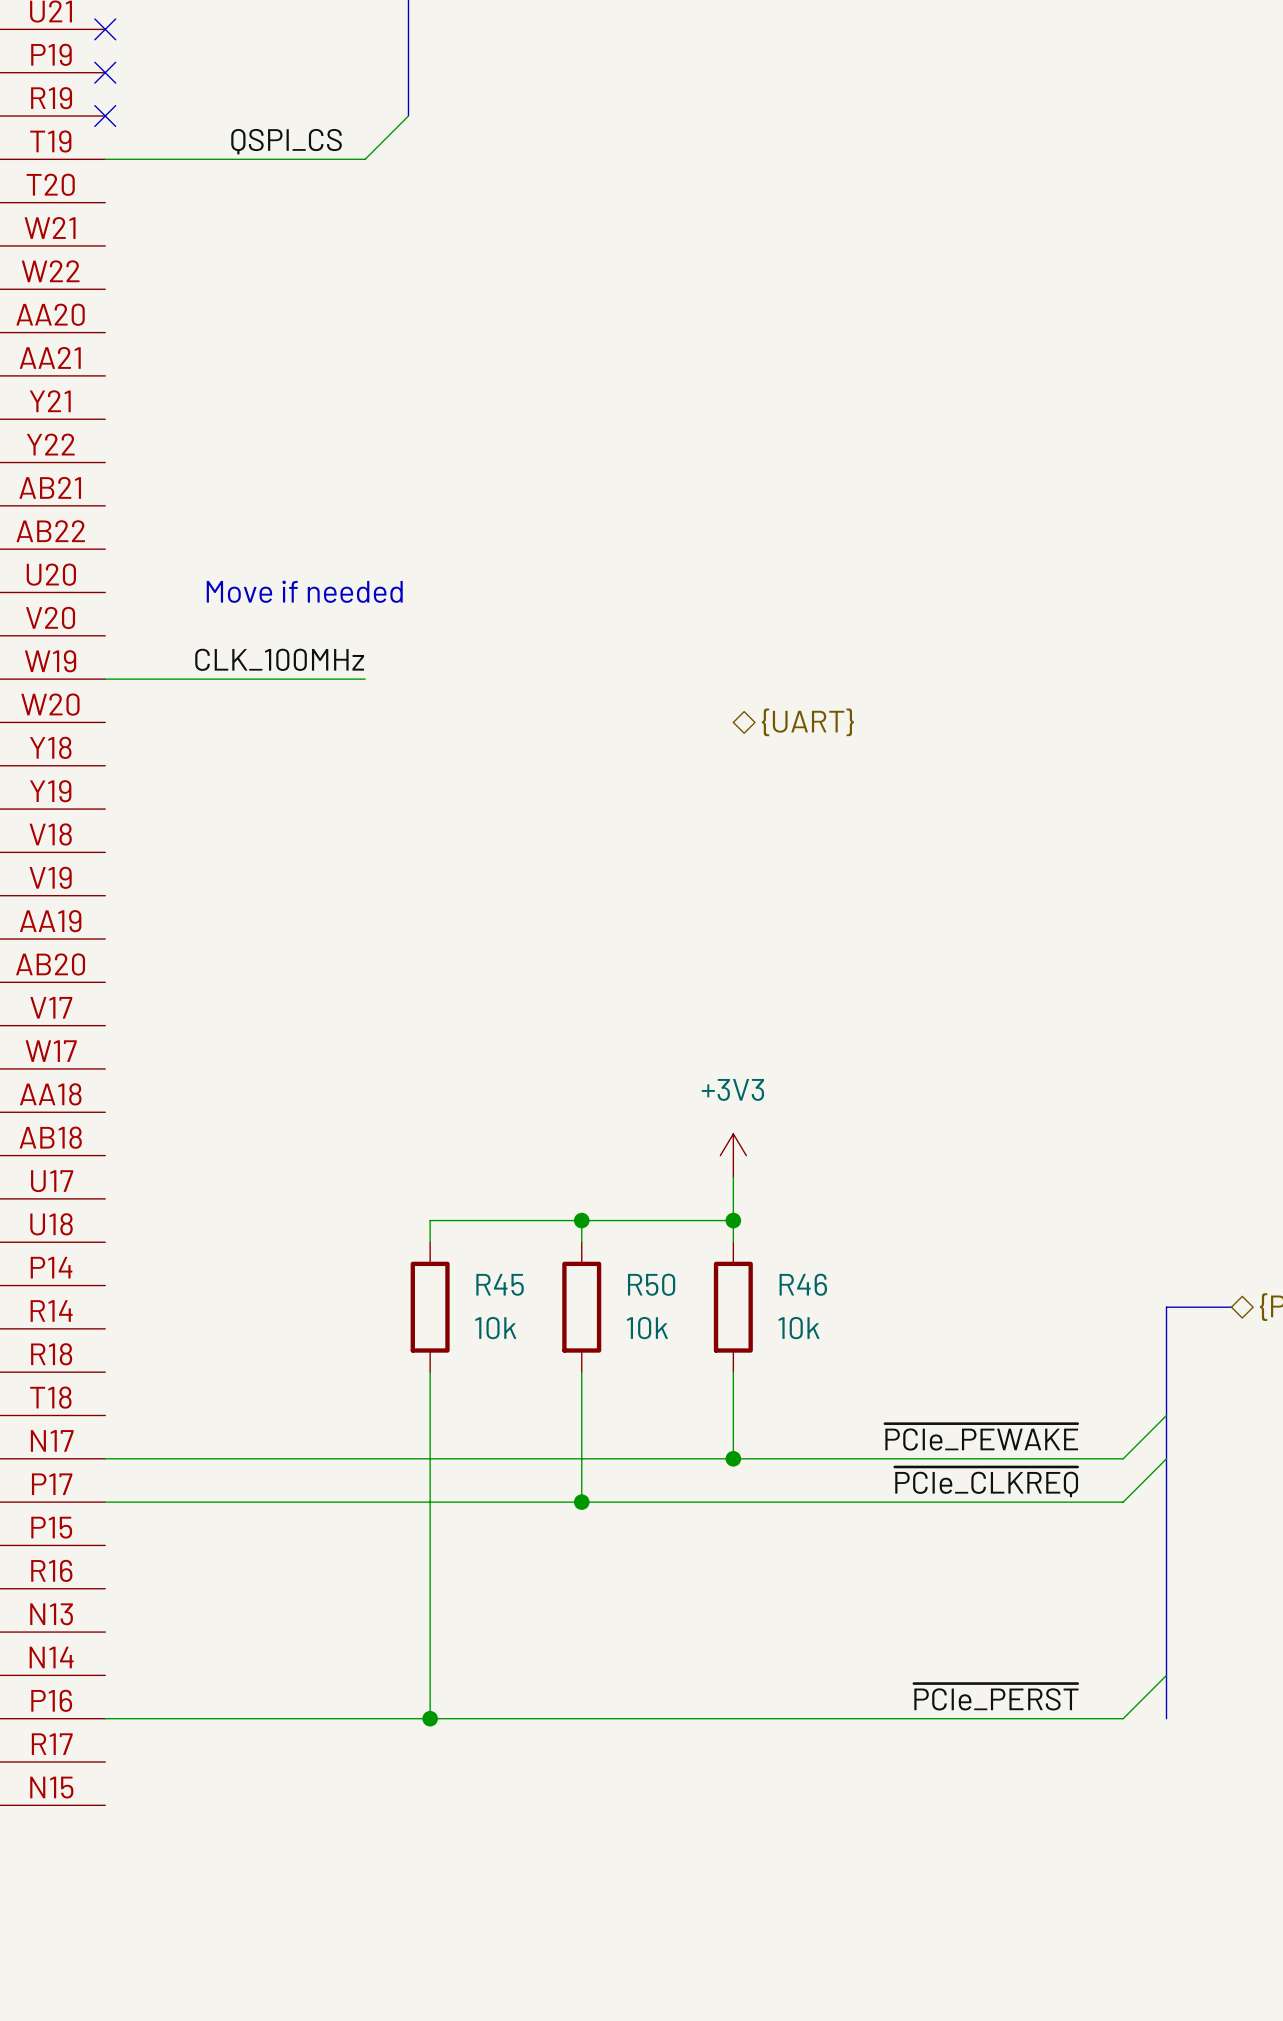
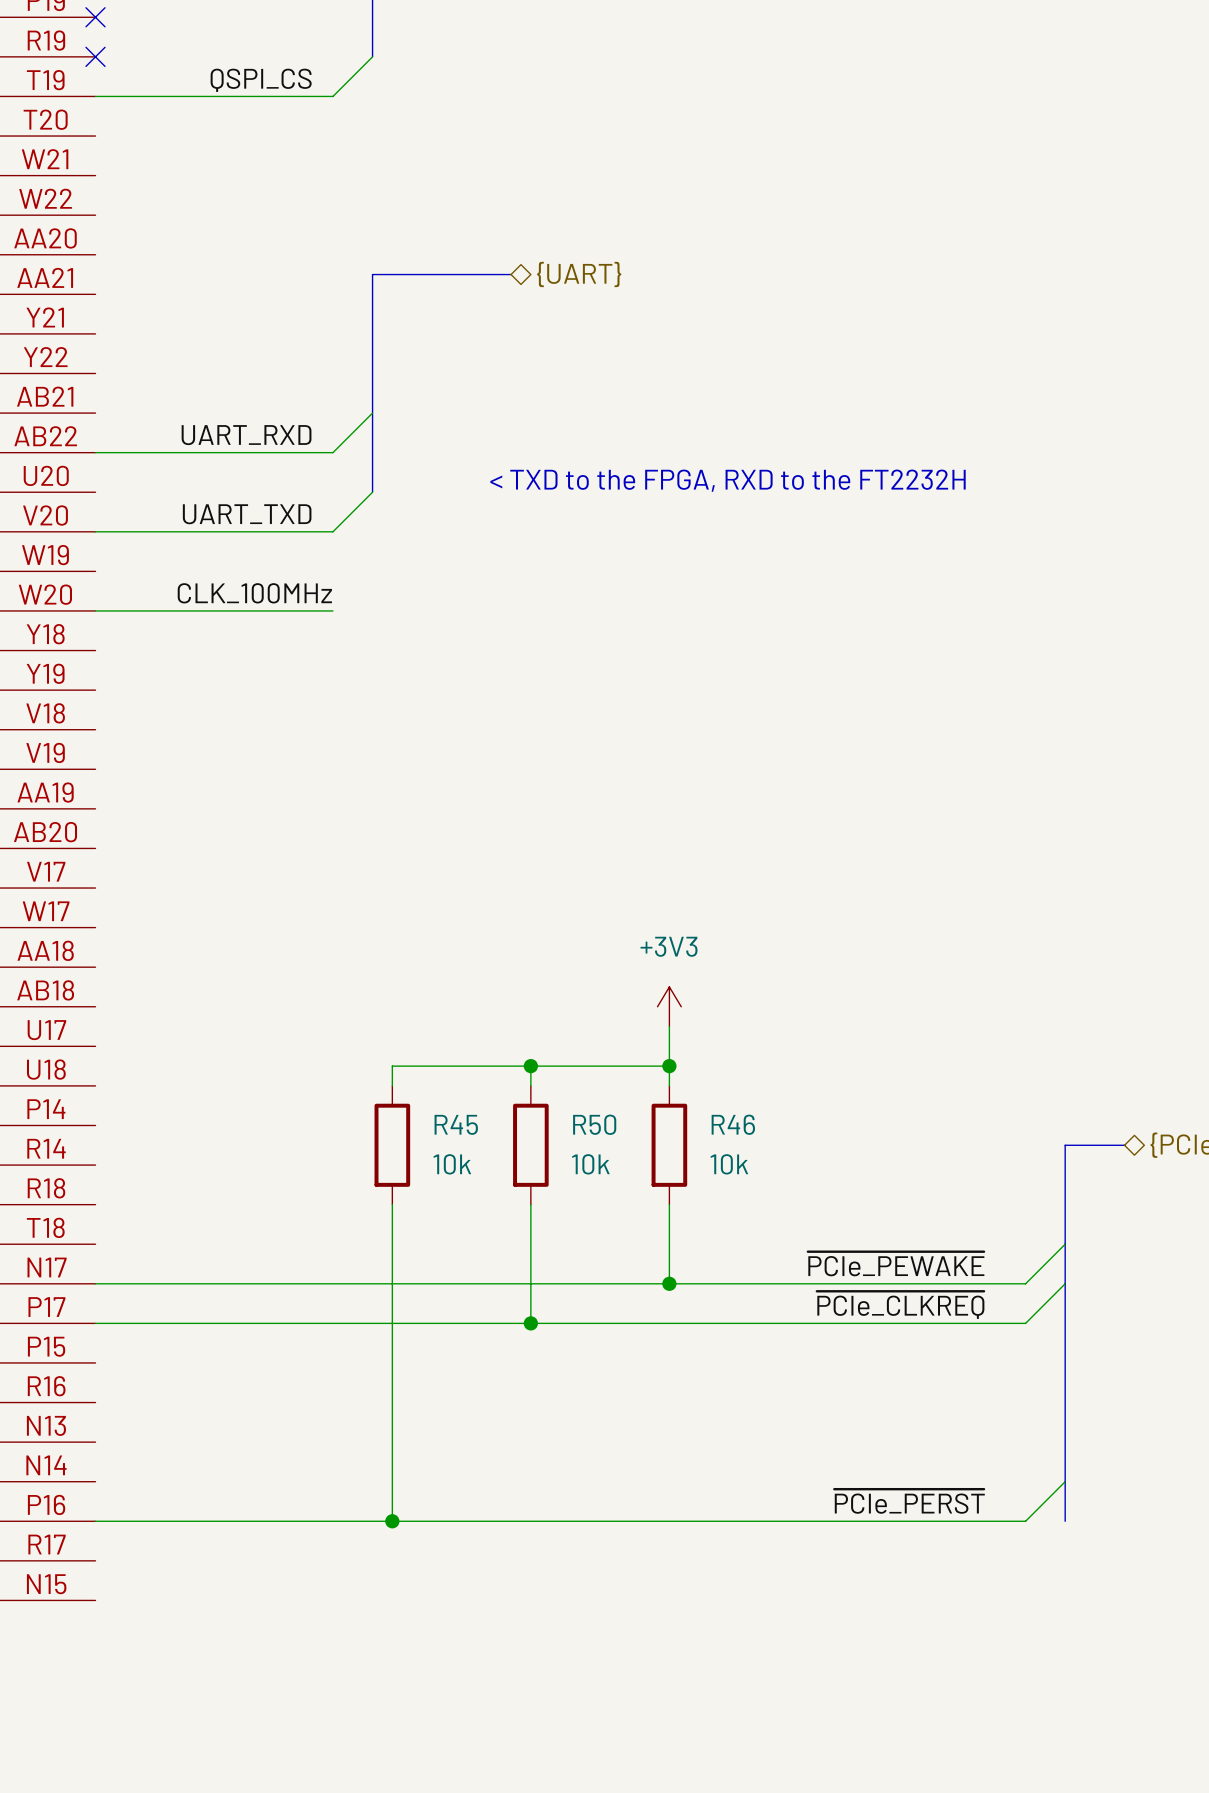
bus: none -> (511, 274) (372, 274) (372, 492)
wire: none -> (372, 413) (332, 452) (95, 452)
label: none -> UART_RXD (246, 435)
text: none -> < TXD to the FPGA, RXD to the FT2232H (728, 480)
text: Move if needed (304, 591) -> none
wire: none -> (372, 492) (332, 531) (95, 531)
label: none -> UART_TXD (247, 514)
label position: CLK_100MHz (279, 659) -> CLK_100MHz (254, 593)
wire: (105, 679) (365, 679) -> (95, 610) (332, 610)
hierarchical label position: {UART} (807, 722) -> {UART} (579, 274)

